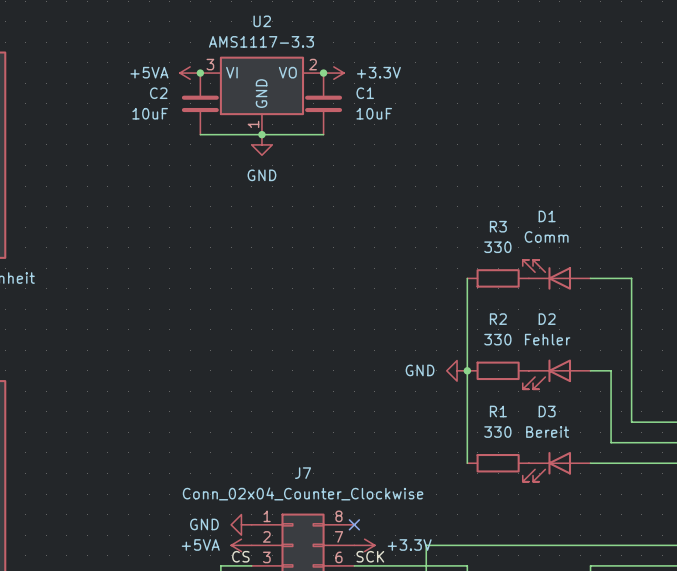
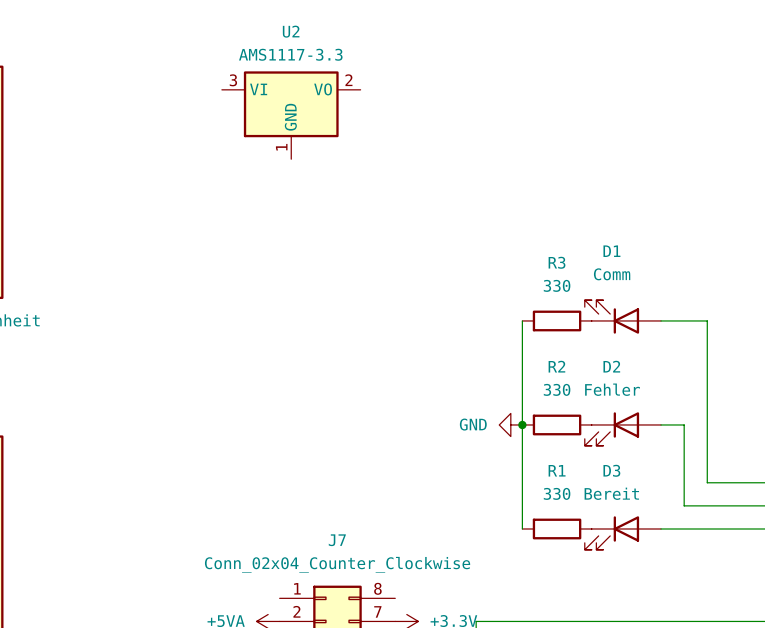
power symbol: +5VA (190, 73) -> none
junction: (200, 73) -> none
junction: (323, 73) -> none
power symbol: +3.3V (333, 73) -> none
C2: 10uF (200, 103) -> none
C1: 10uF (323, 103) -> none
wire: (200, 134) (323, 134) -> none
junction: (261, 134) -> none
power symbol: GND (261, 144) -> none
power symbol: GND (241, 524) -> none
no-connect mark: (354, 524) -> none

